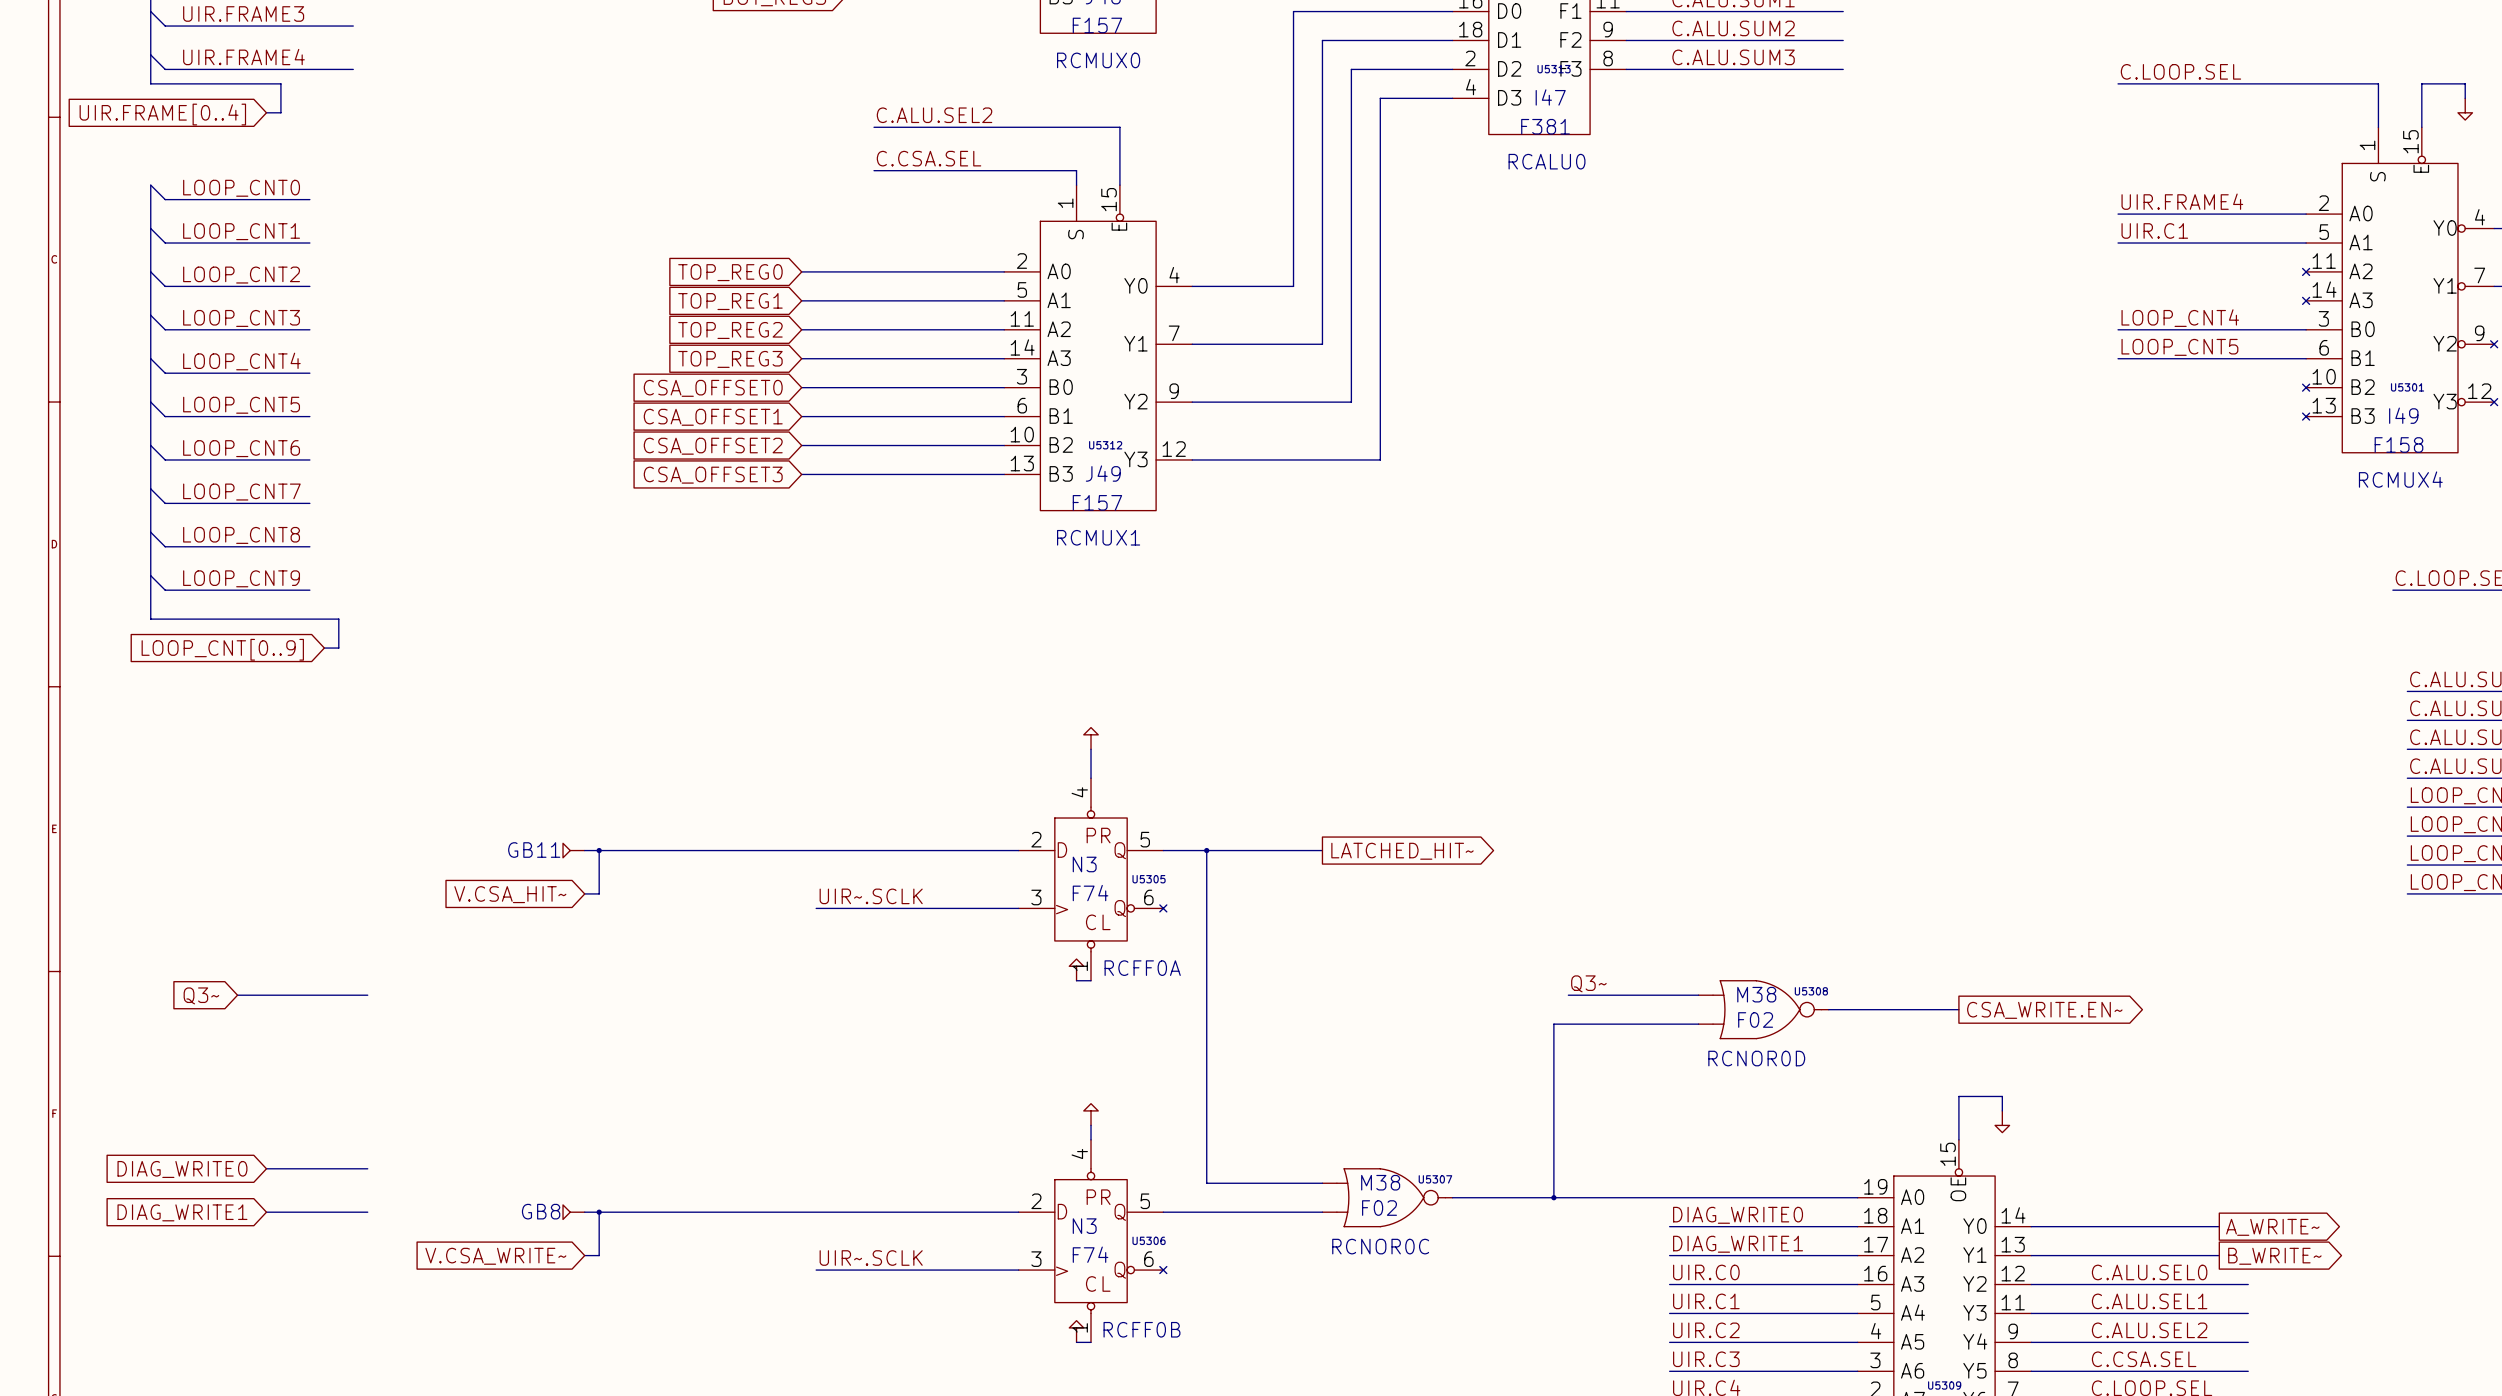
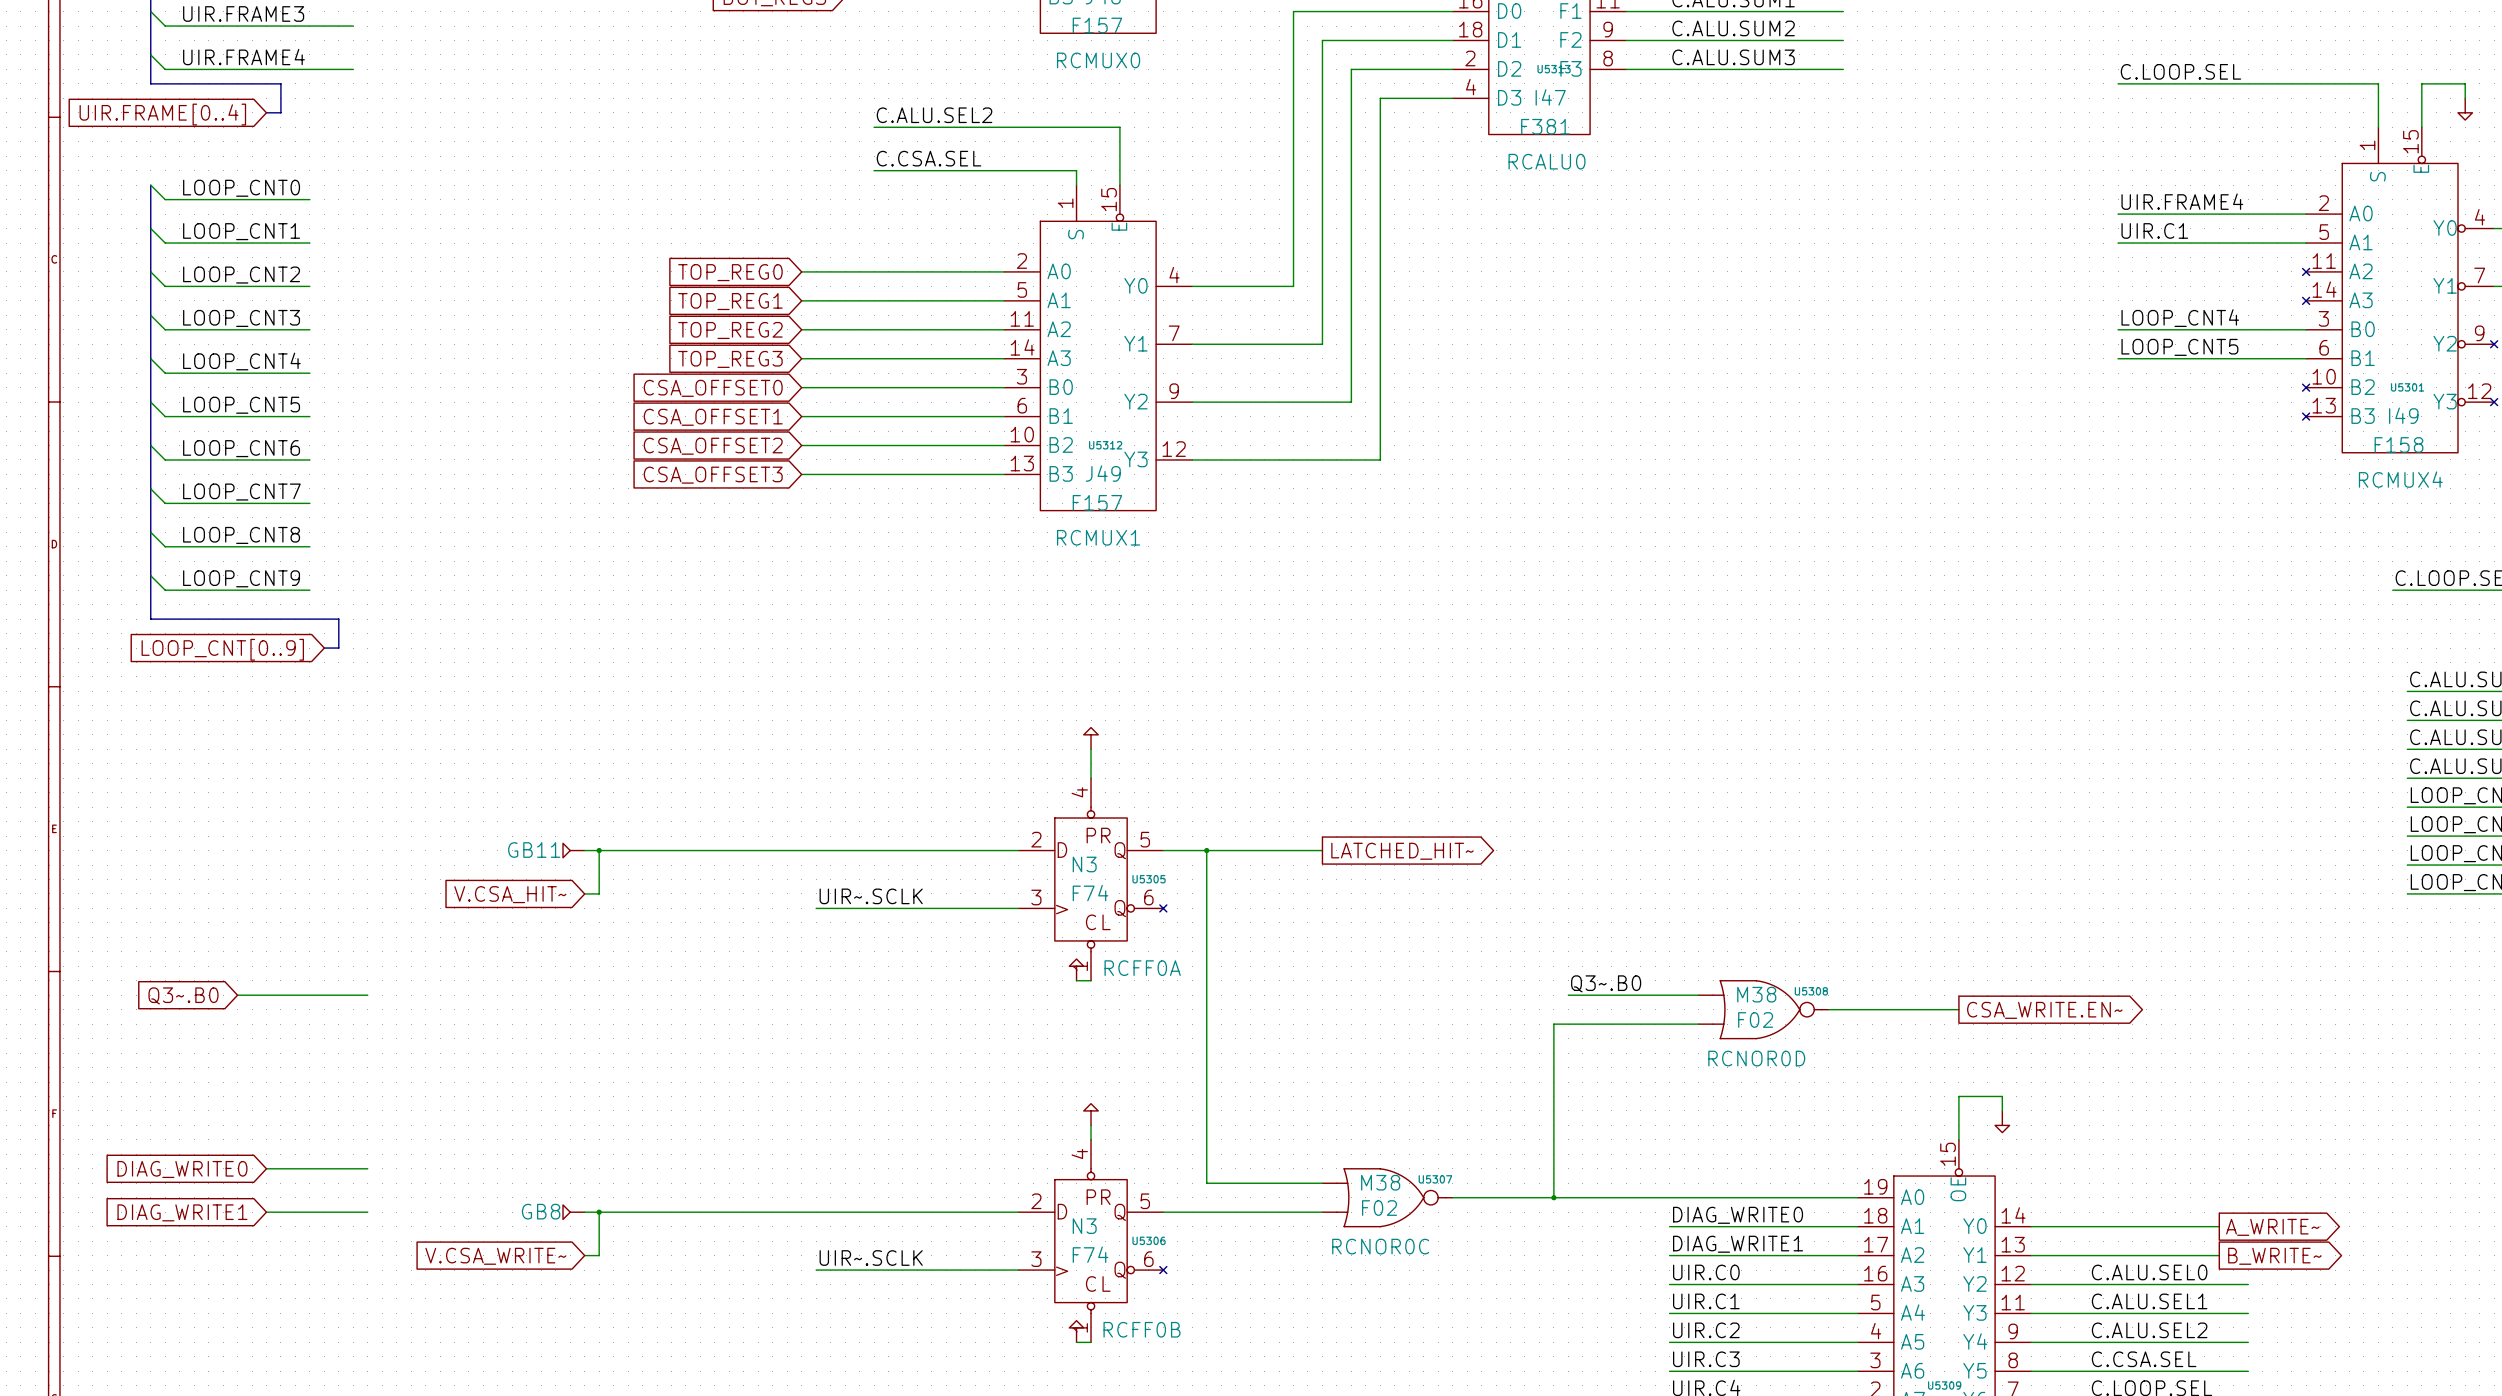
label: Q3~ (1588, 983) -> Q3~.B0 (1606, 983)
global label: Q3~ (201, 995) -> Q3~.B0 (183, 995)

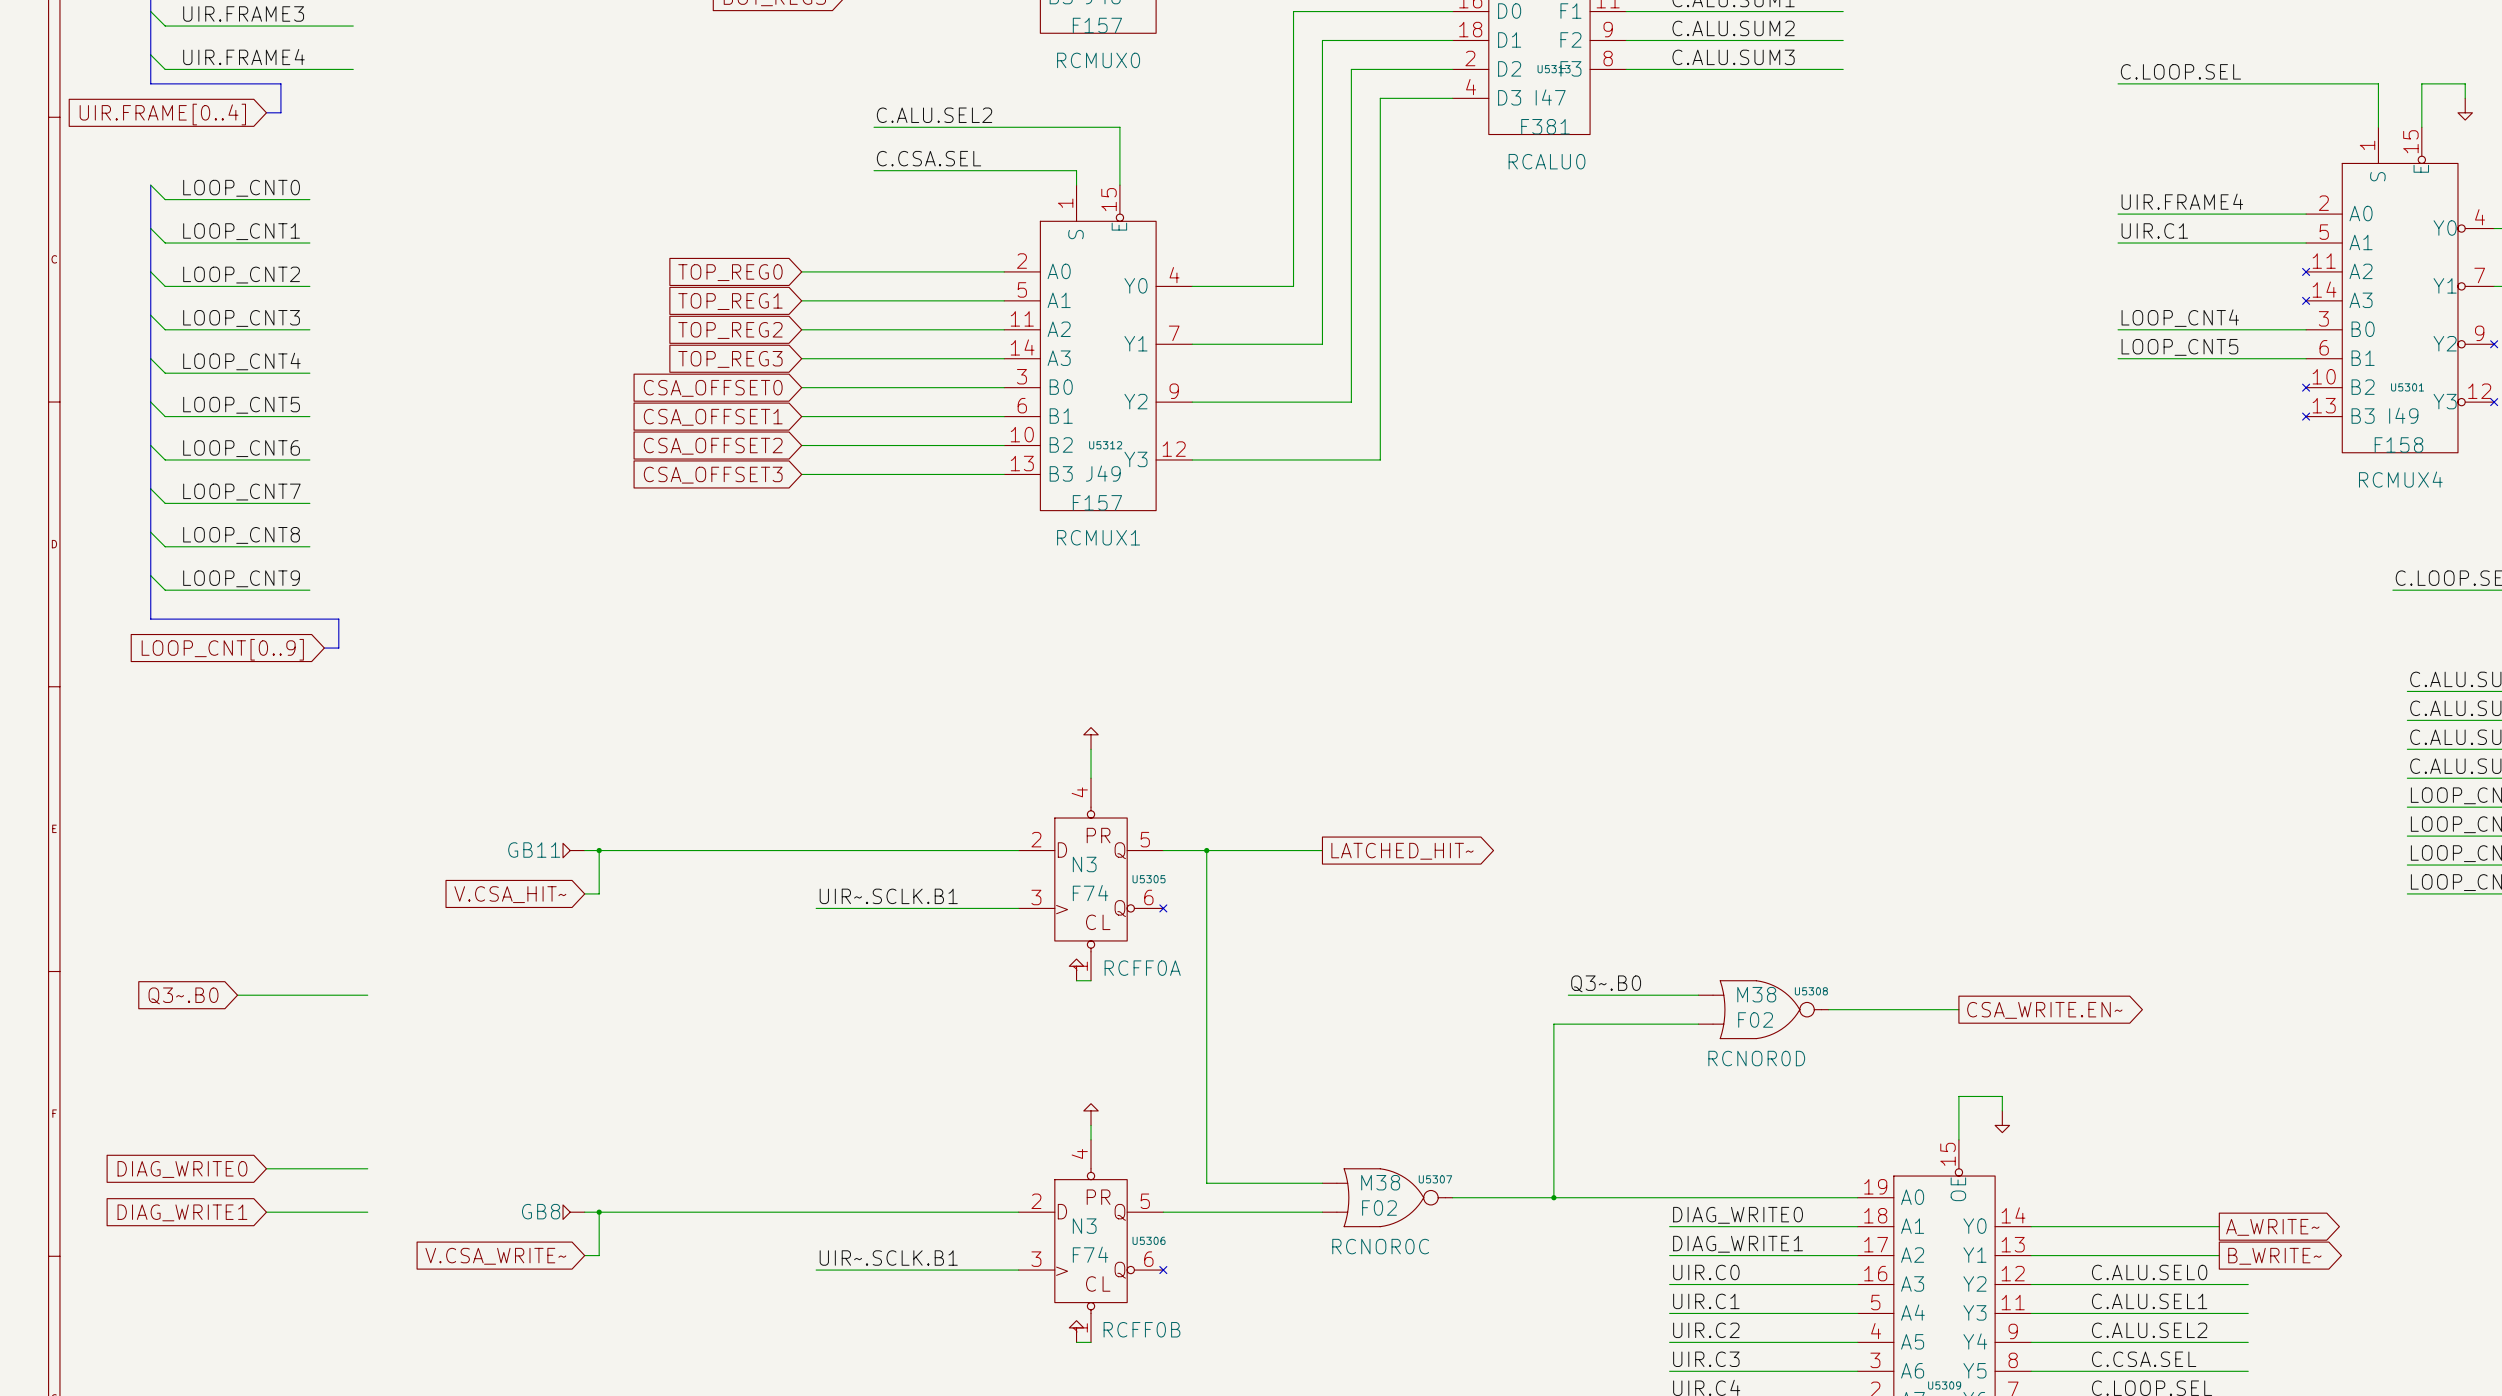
label: UIR~.SCLK (871, 896) -> UIR~.SCLK.B1 (888, 896)
label: UIR~.SCLK (871, 1258) -> UIR~.SCLK.B1 (888, 1258)

